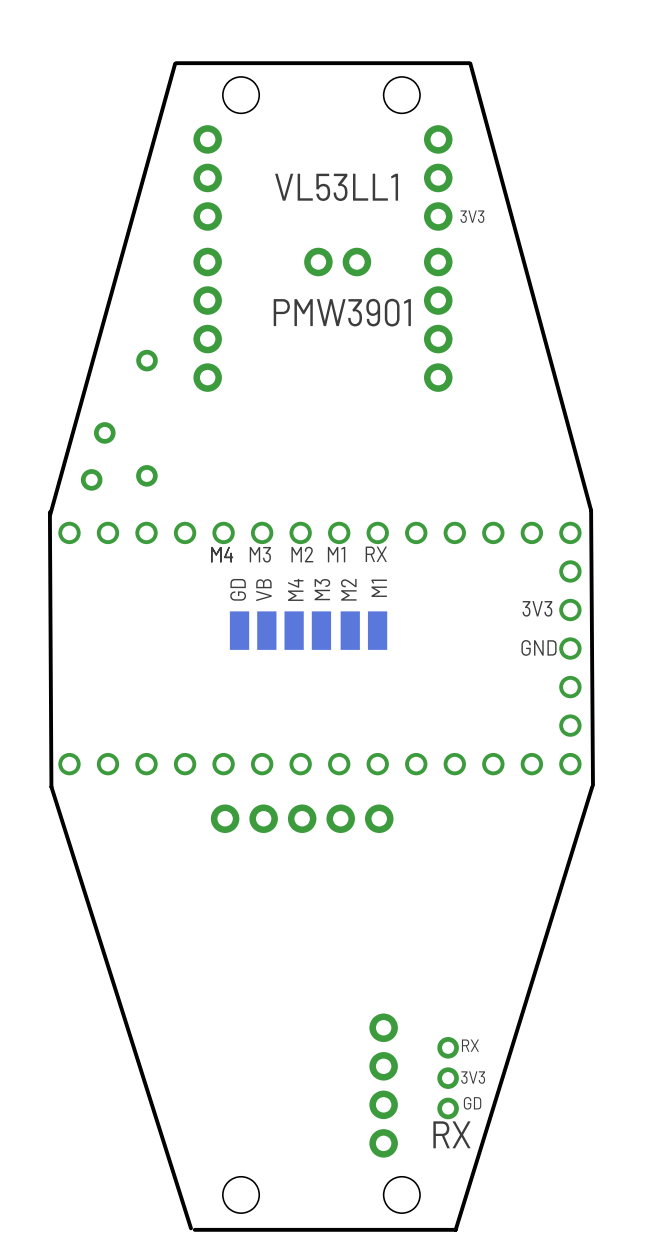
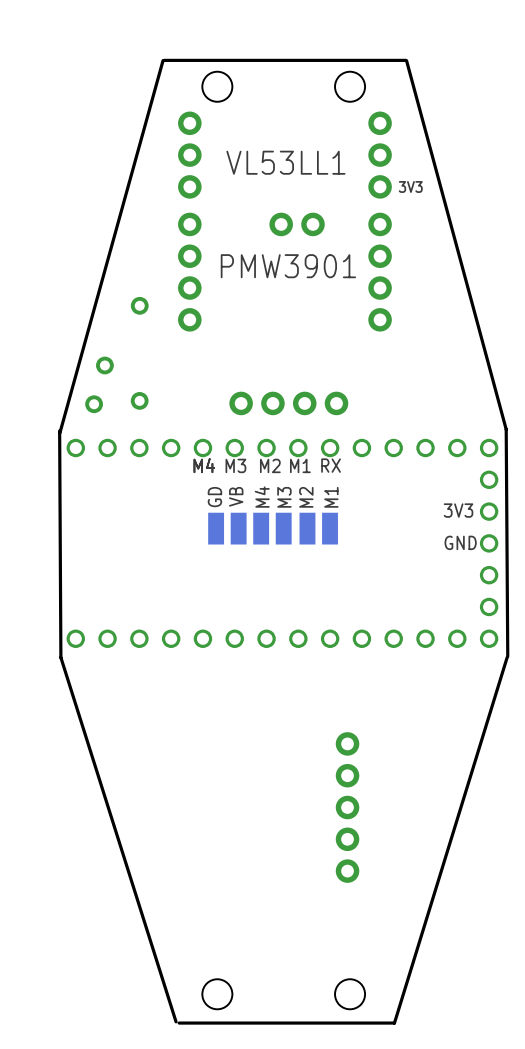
part: none -> (288, 403)
part rotation: 0° (302, 818) -> 90° clockwise (347, 807)
part position: (302, 818) -> (347, 807)
text: RX (470, 1045) -> none
text: 3V3 (473, 1077) -> none
part: (448, 1078) -> none
part: (383, 1085) -> none
text: GD (472, 1103) -> none
text: RX (451, 1134) -> none

